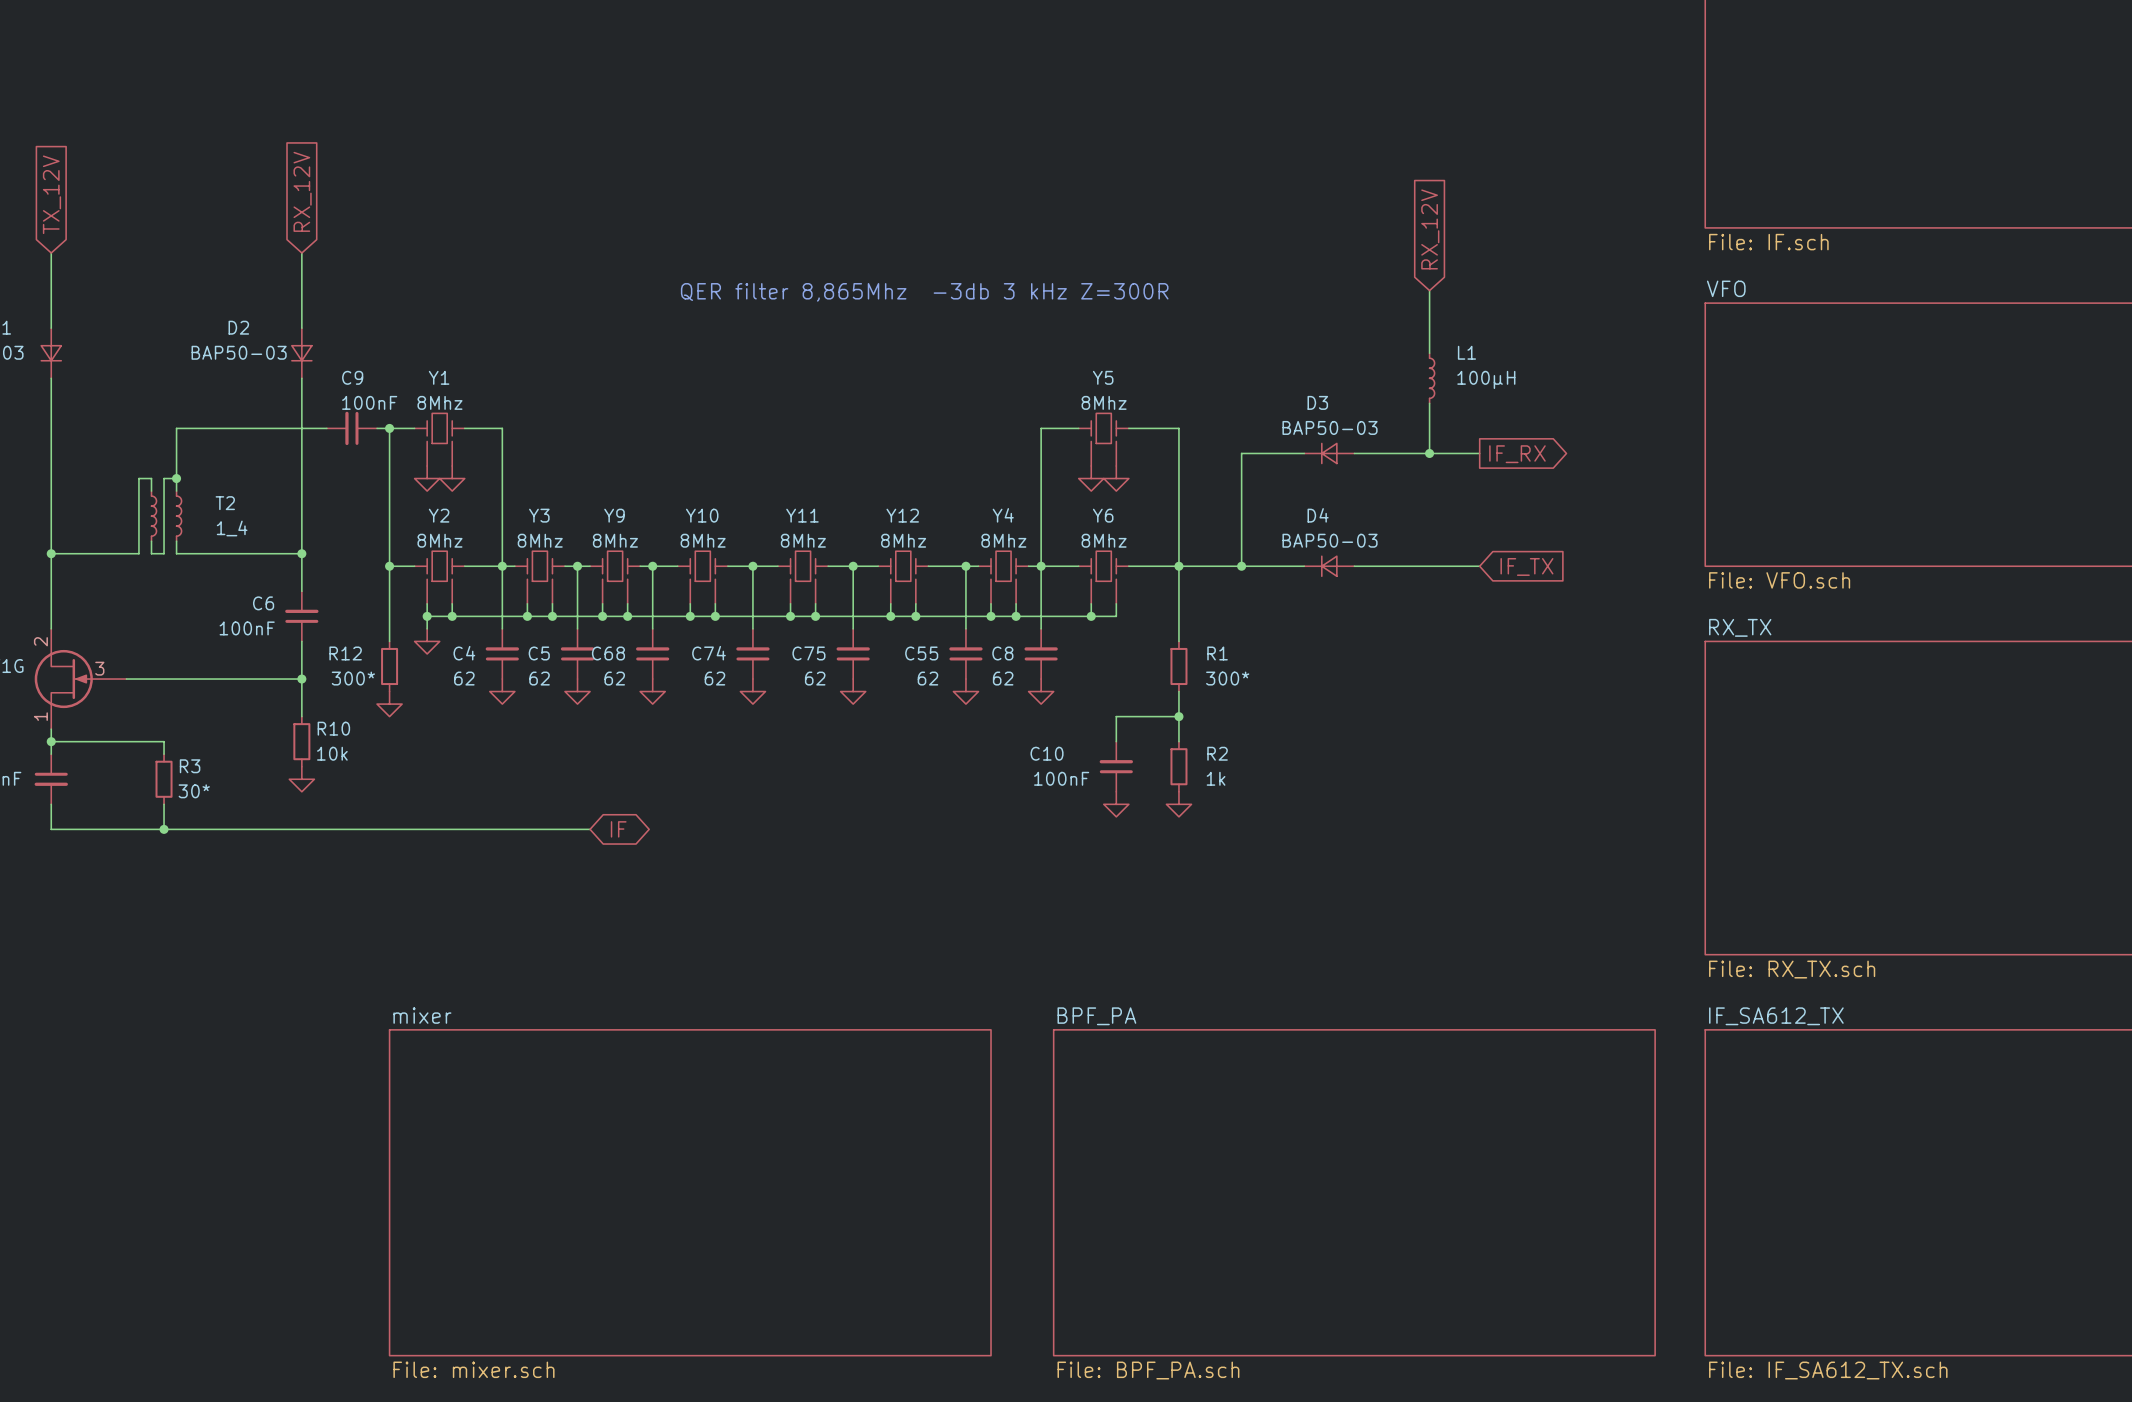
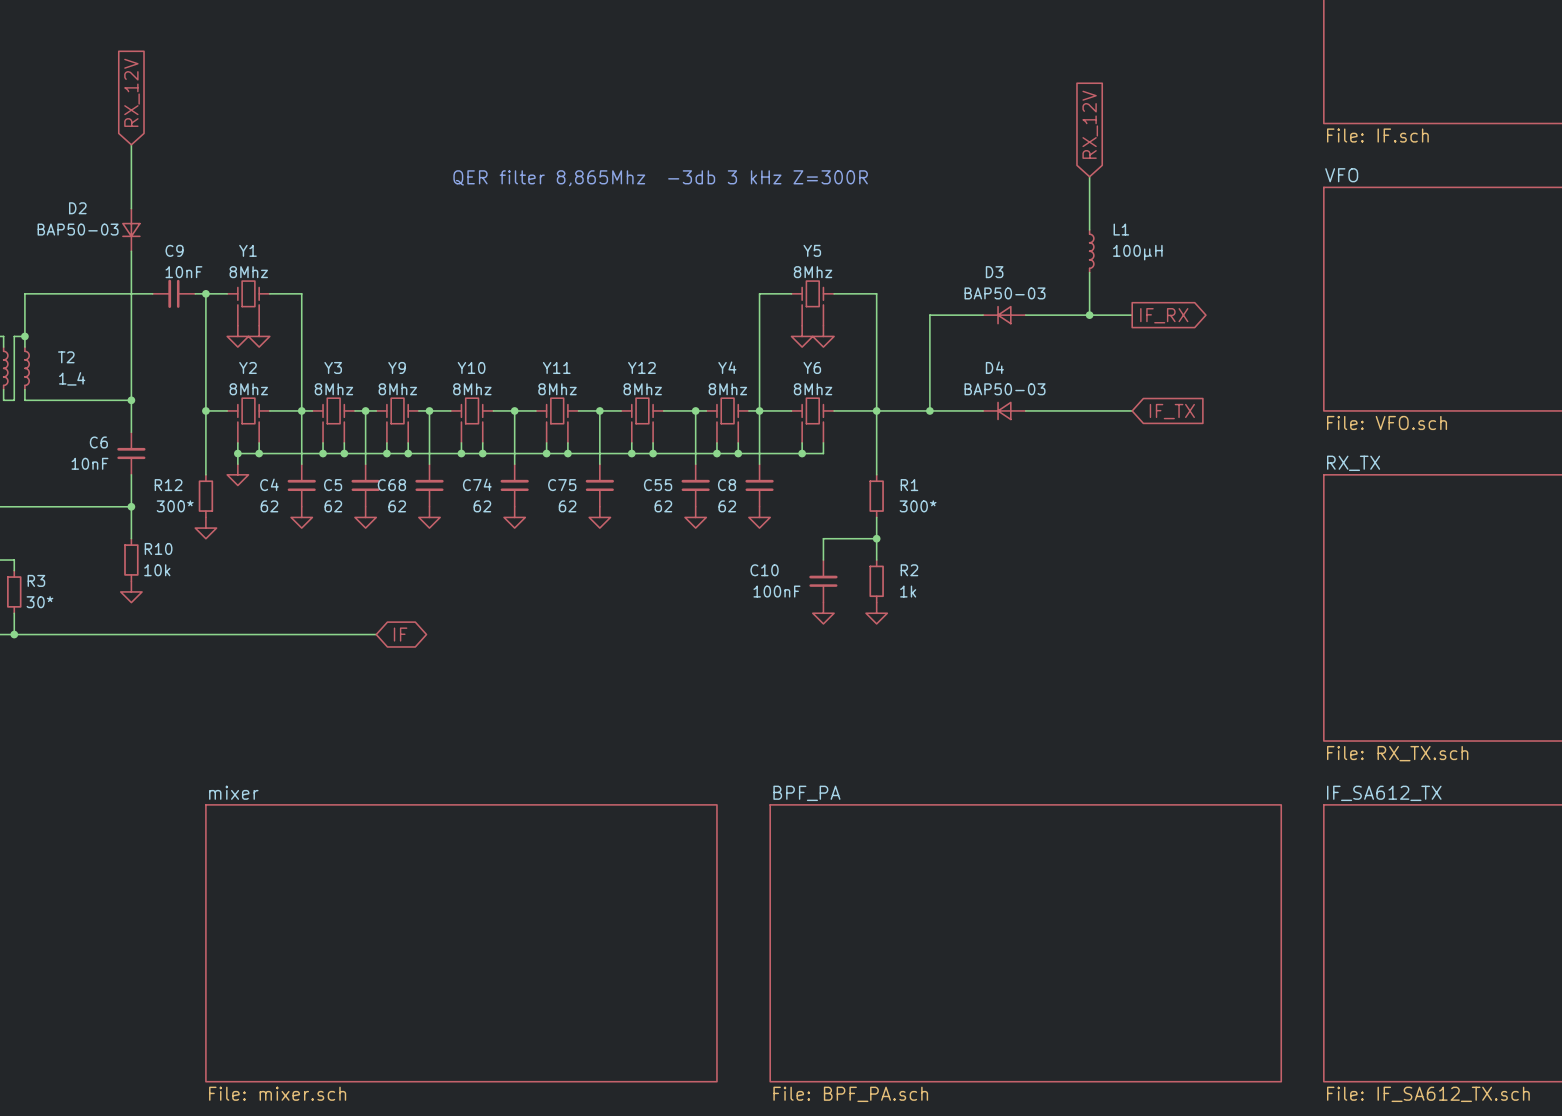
C9 value: 100nF (369, 402) -> 10nF (183, 272)
C6 value: 100nF (247, 628) -> 10nF (89, 463)

